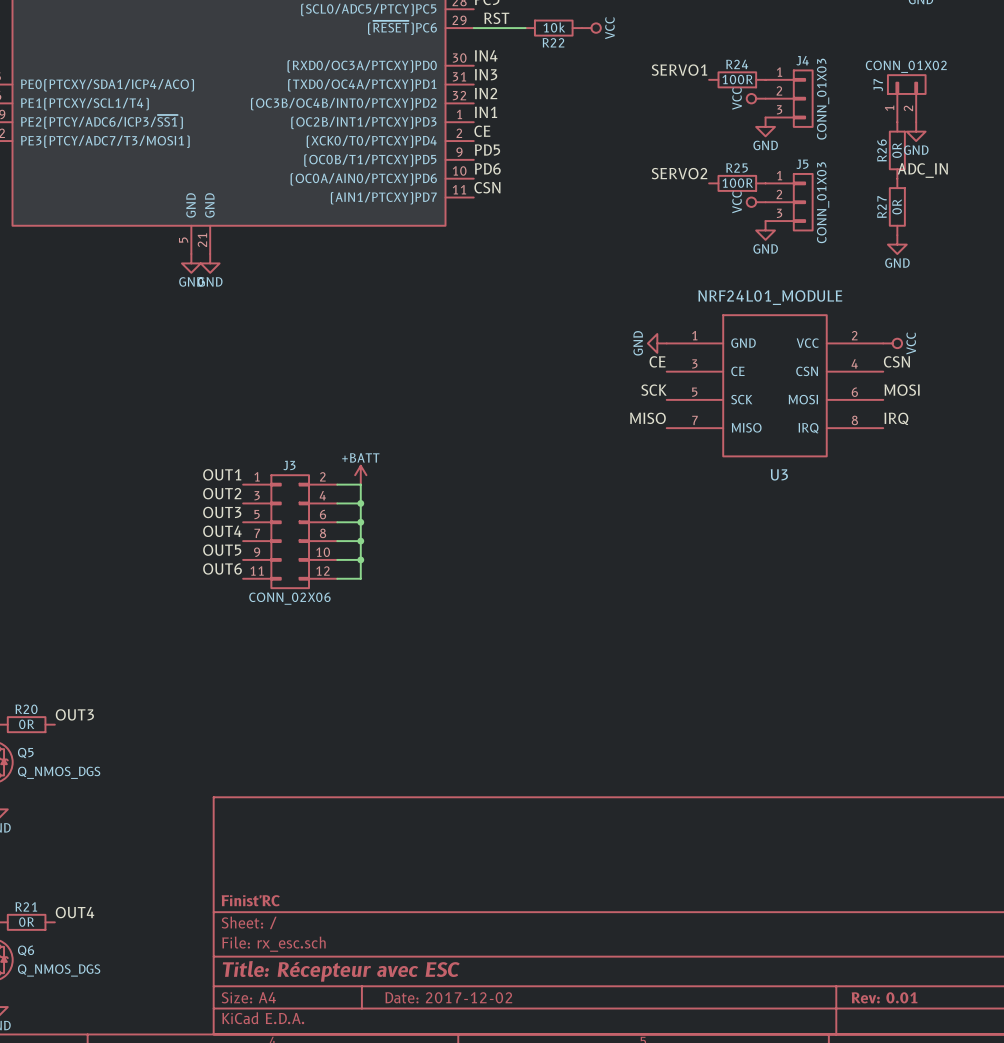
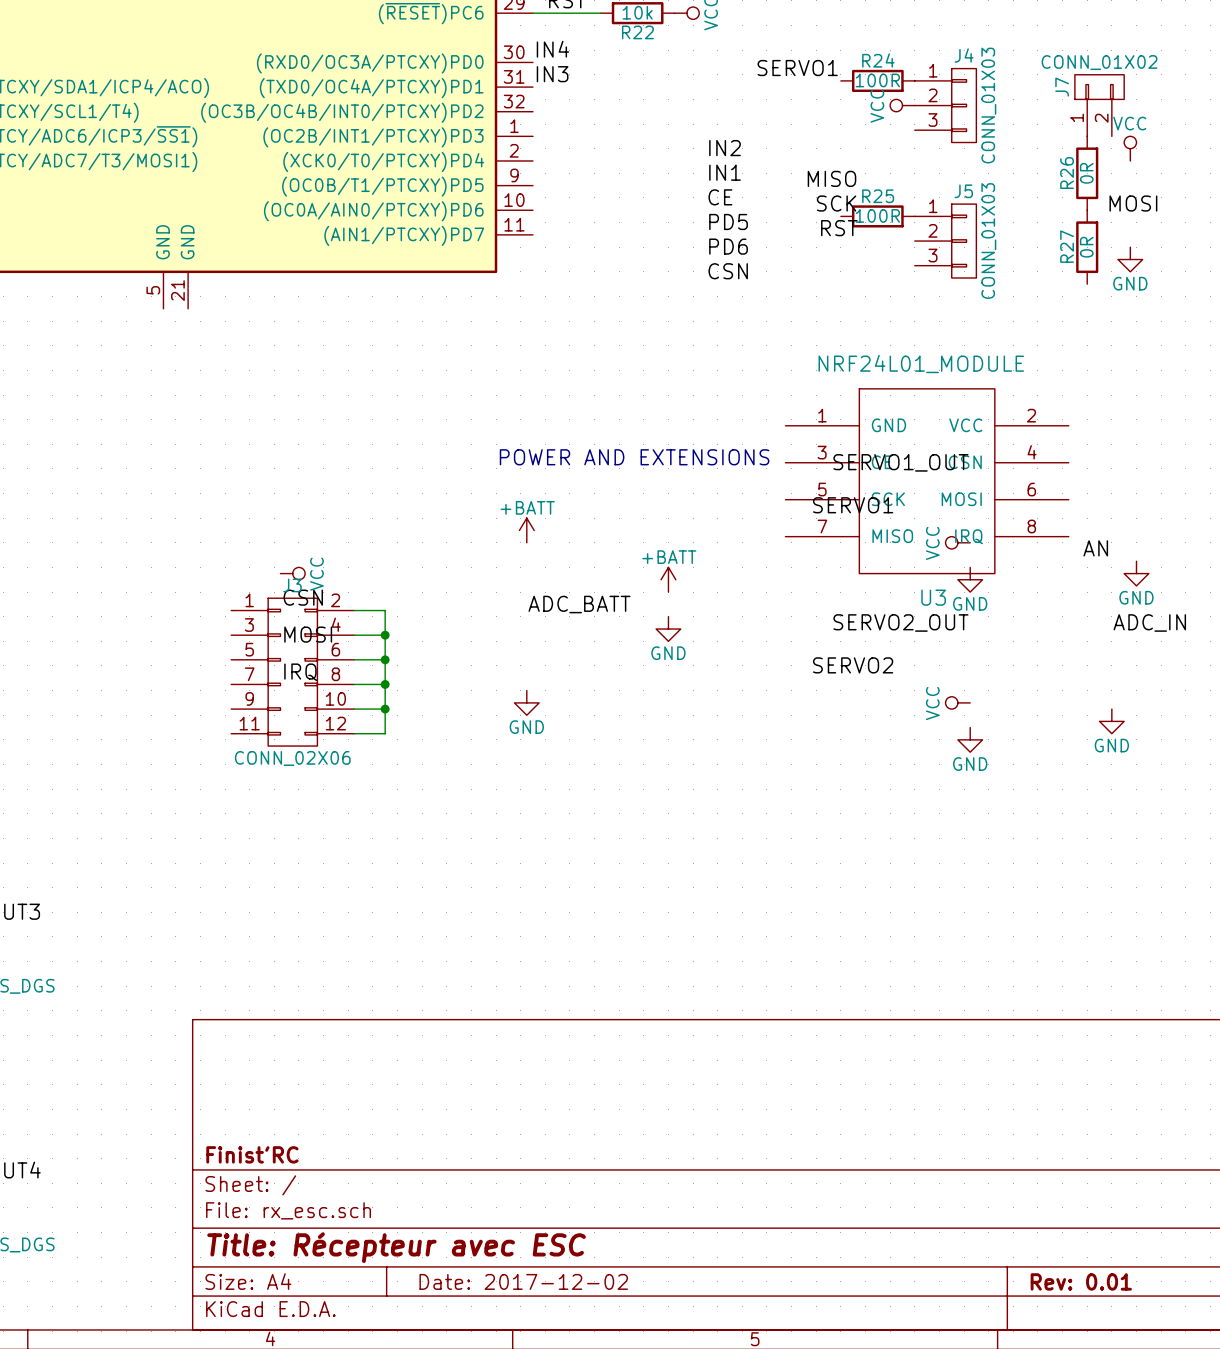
label position: IN2 (486, 93) -> IN2 (725, 148)
label position: IN1 (486, 112) -> IN1 (725, 172)
power symbol: GND (765, 126) -> none
label: CE (482, 131) -> none
power symbol: GND (916, 131) -> none
power symbol: none -> VCC (1130, 148)
label position: PD5 (487, 150) -> PD5 (728, 221)
label: none -> MISO (831, 178)
label position: PD6 (487, 168) -> PD6 (728, 246)
label: none -> CE (720, 197)
label: ADC_IN (922, 170) -> none
label: SERVO2 (679, 173) -> none
label: none -> SCK (836, 203)
label: none -> MOSI (1133, 203)
label position: CSN (487, 187) -> CSN (728, 271)
label: none -> RST (839, 228)
power symbol: VCC (756, 202) -> none
power symbol: none -> GND (1130, 259)
power symbol: GND (765, 230) -> none
power symbol: GND (897, 244) -> none
power symbol: GND (191, 263) -> none
power symbol: GND (210, 263) -> none
power symbol: GND (657, 343) -> none
power symbol: VCC (892, 343) -> none
label: CE (657, 361) -> none
label: CSN (896, 361) -> none
text: none -> POWER AND EXTENSIONS (634, 457)
label: none -> SERVO1_OUT (900, 462)
label: SCK (653, 390) -> none
label: MOSI (902, 390) -> none
label: none -> SERVO1 (853, 505)
label: MISO (647, 418) -> none
label: IRQ (896, 418) -> none
power symbol: none -> +BATT (526, 530)
power symbol: none -> VCC (957, 542)
label: none -> AN (1095, 548)
power symbol: none -> VCC (292, 573)
power symbol: none -> GND (1136, 573)
power symbol: none -> +BATT (668, 579)
power symbol: none -> GND (970, 579)
label: OUT1 (222, 474) -> none
label: none -> CSN (303, 597)
power symbol: +BATT (360, 475) -> none
label: none -> ADC_BATT (579, 604)
label: OUT2 (222, 493) -> none
label: none -> SERVO2_OUT (900, 622)
label: none -> ADC_IN (1149, 622)
power symbol: none -> GND (668, 629)
label: none -> MOSI (308, 634)
label: OUT3 (222, 512) -> none
label: none -> SERVO2 (853, 665)
label: OUT4 (222, 531) -> none
label: none -> IRQ (300, 672)
label: OUT5 (222, 550) -> none
power symbol: none -> GND (526, 702)
power symbol: none -> VCC (957, 702)
label: OUT6 (222, 568) -> none
power symbol: none -> GND (1111, 721)
power symbol: none -> GND (970, 739)

